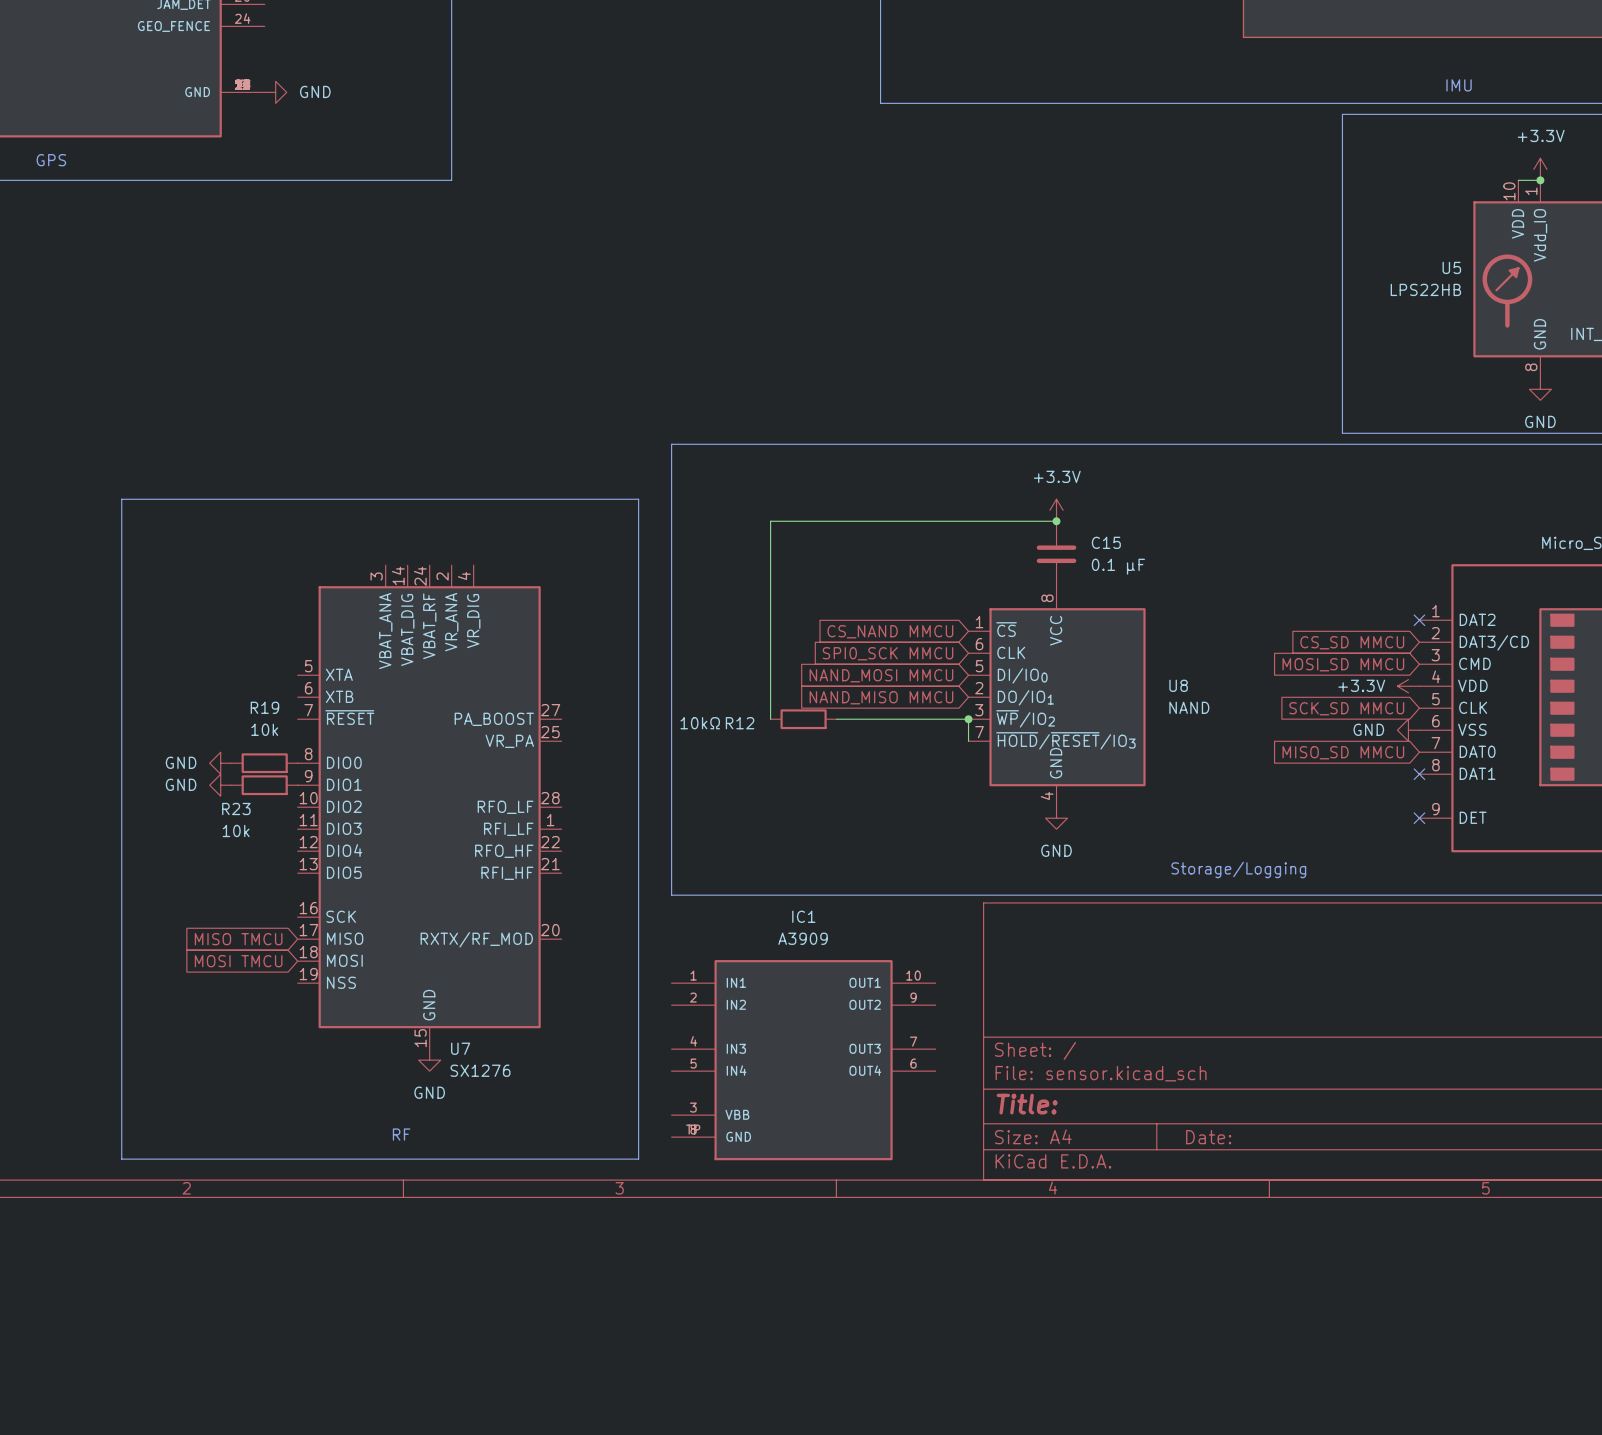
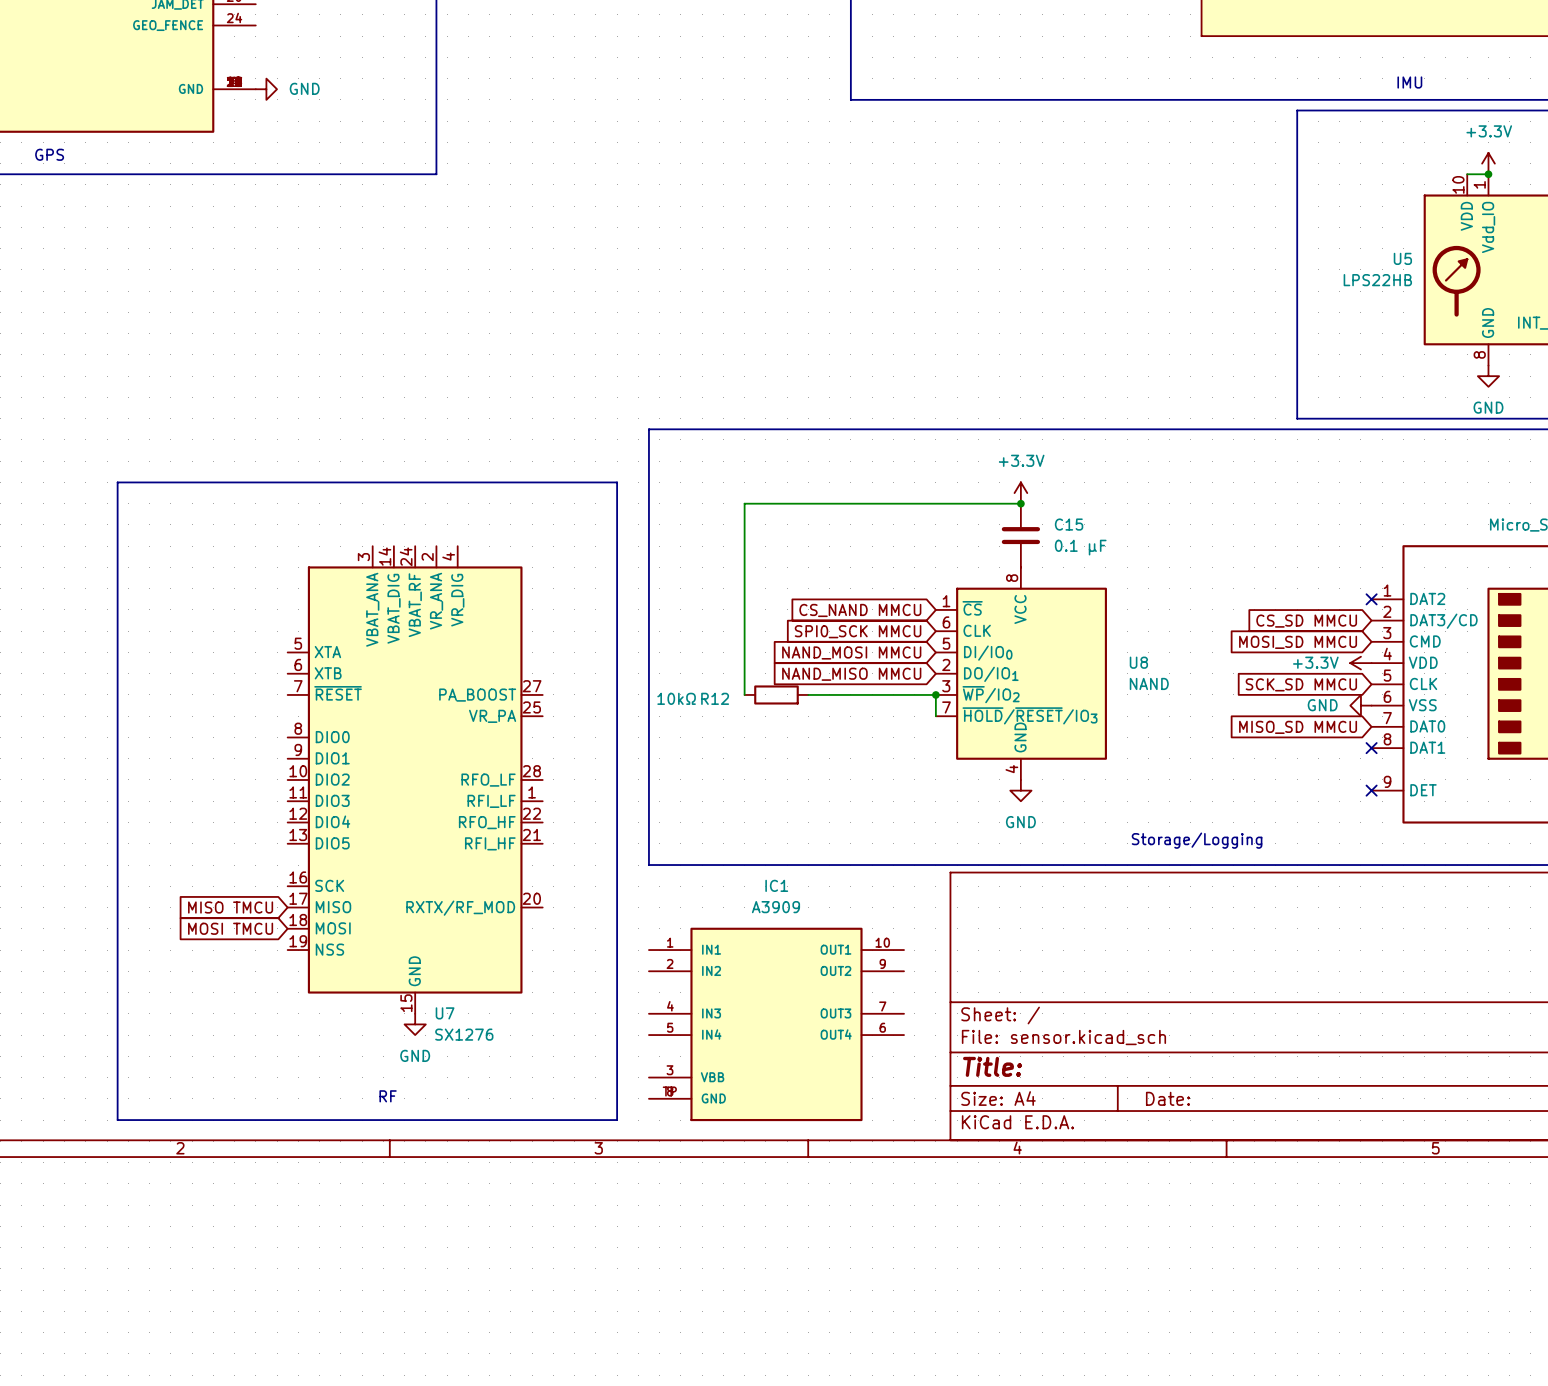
power symbol: GND (220, 763) -> none
R19: 10k (264, 763) -> none
power symbol: GND (220, 785) -> none
R23: 10k (264, 785) -> none

